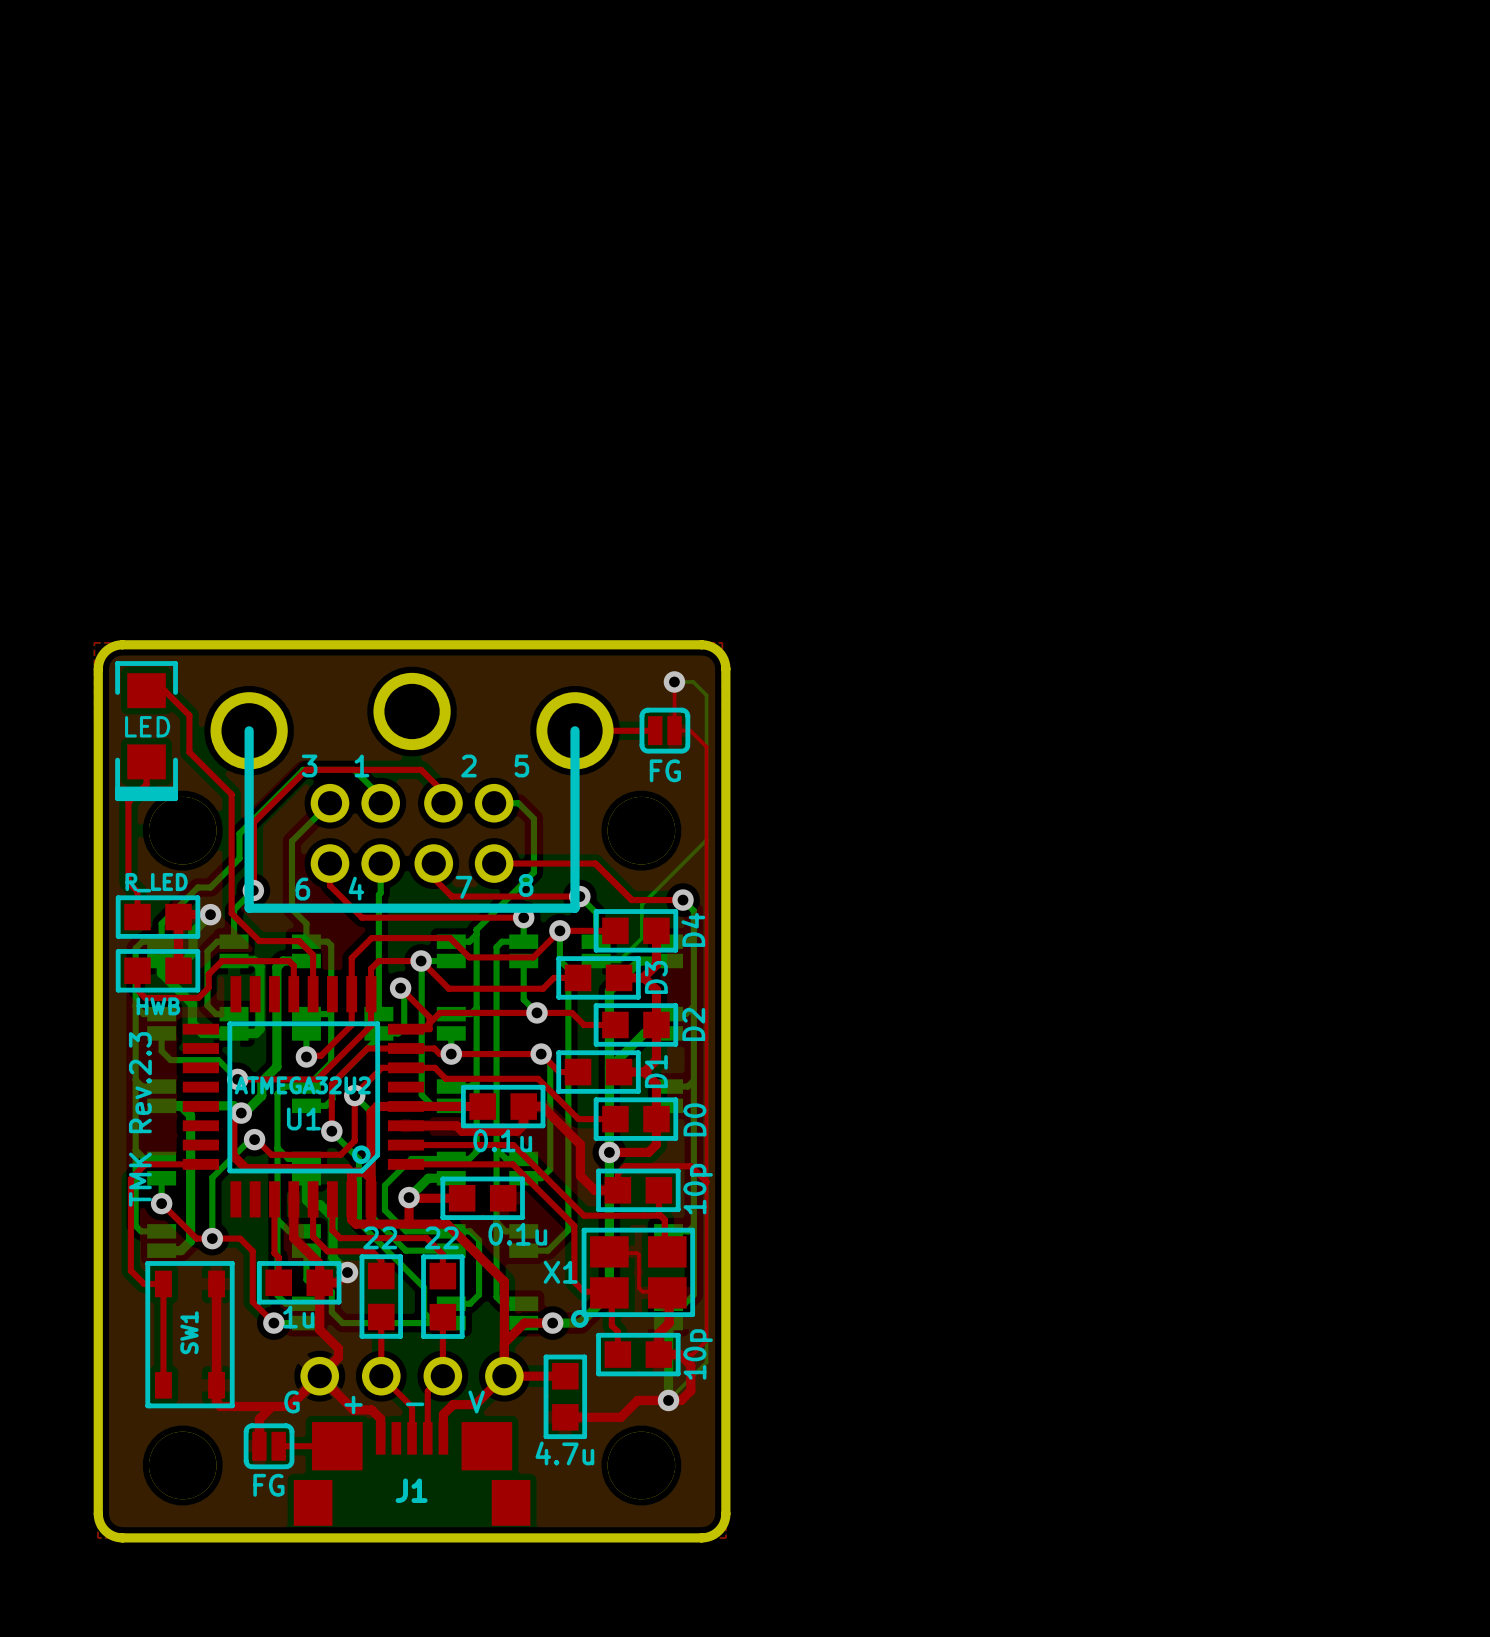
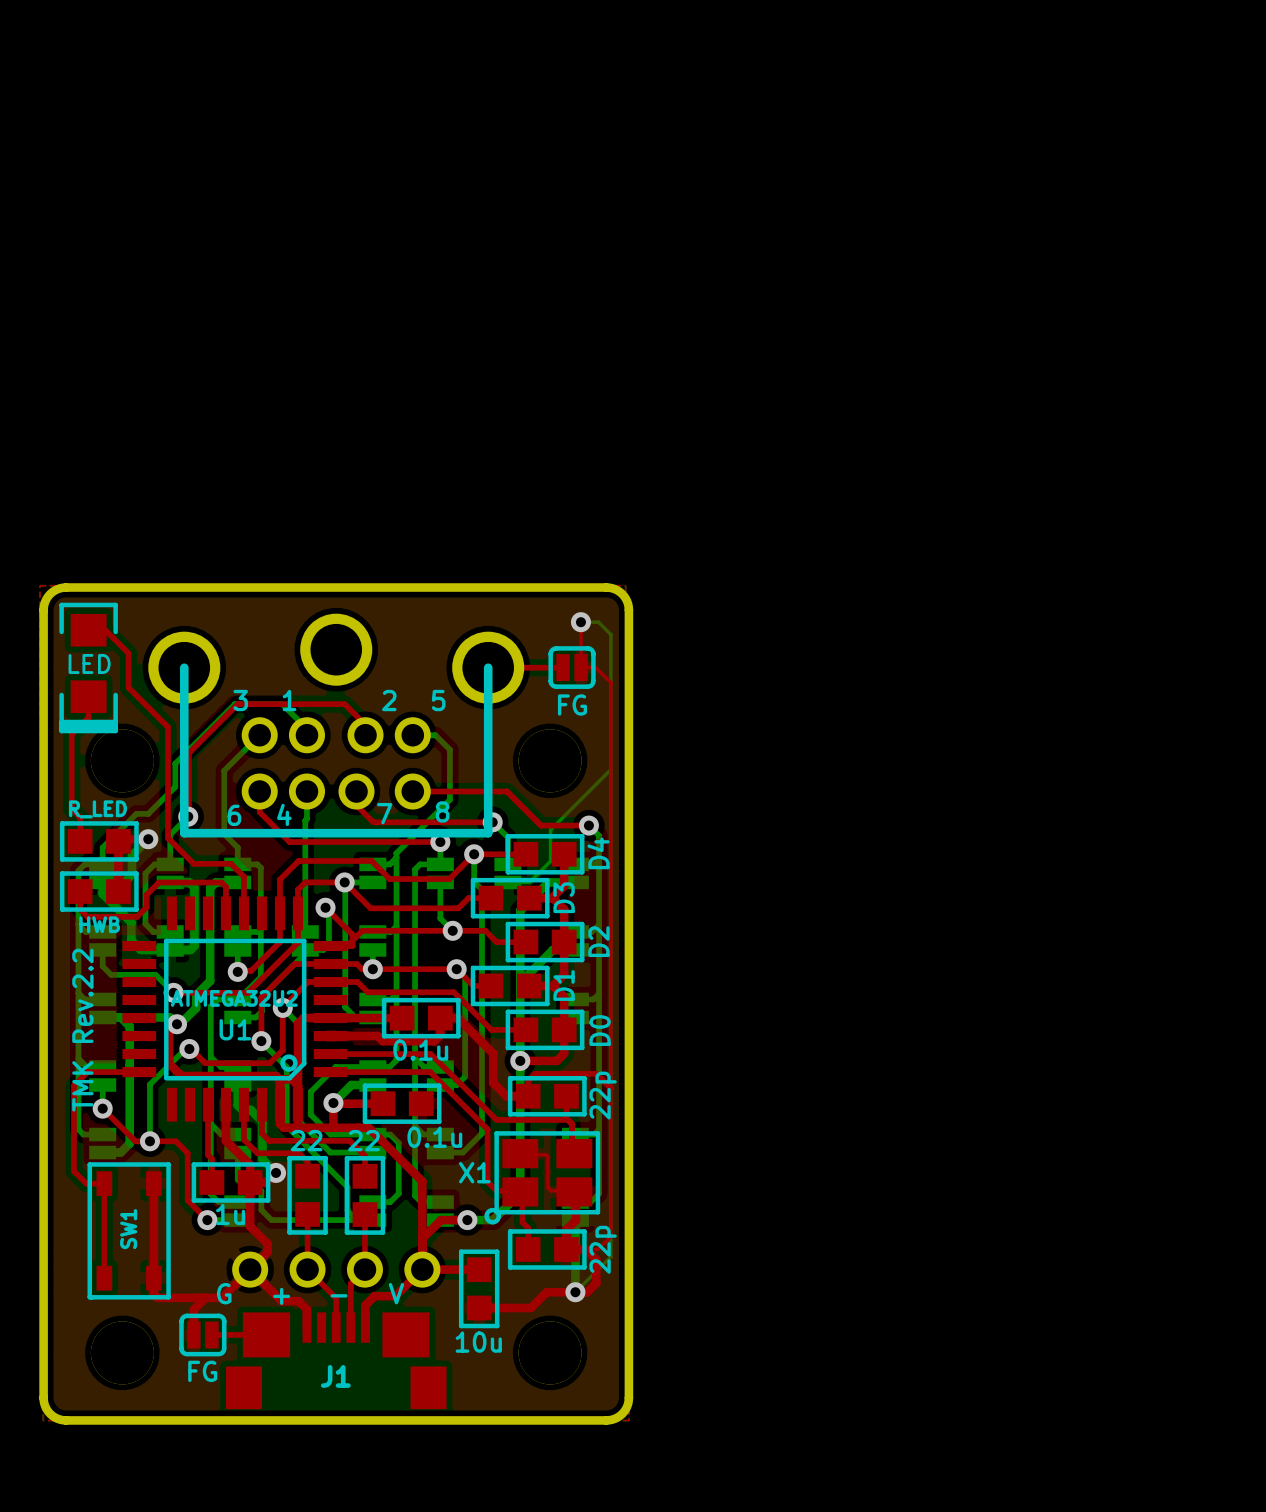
text: TMK Rev.2.3 (140, 1119) -> TMK Rev.2.2 (82, 1030)
part value: 10p (698, 1189) -> 22p (603, 1095)
part value: 10p (698, 1354) -> 22p (603, 1249)
part value: 4.7u (564, 1453) -> 10u (478, 1342)

